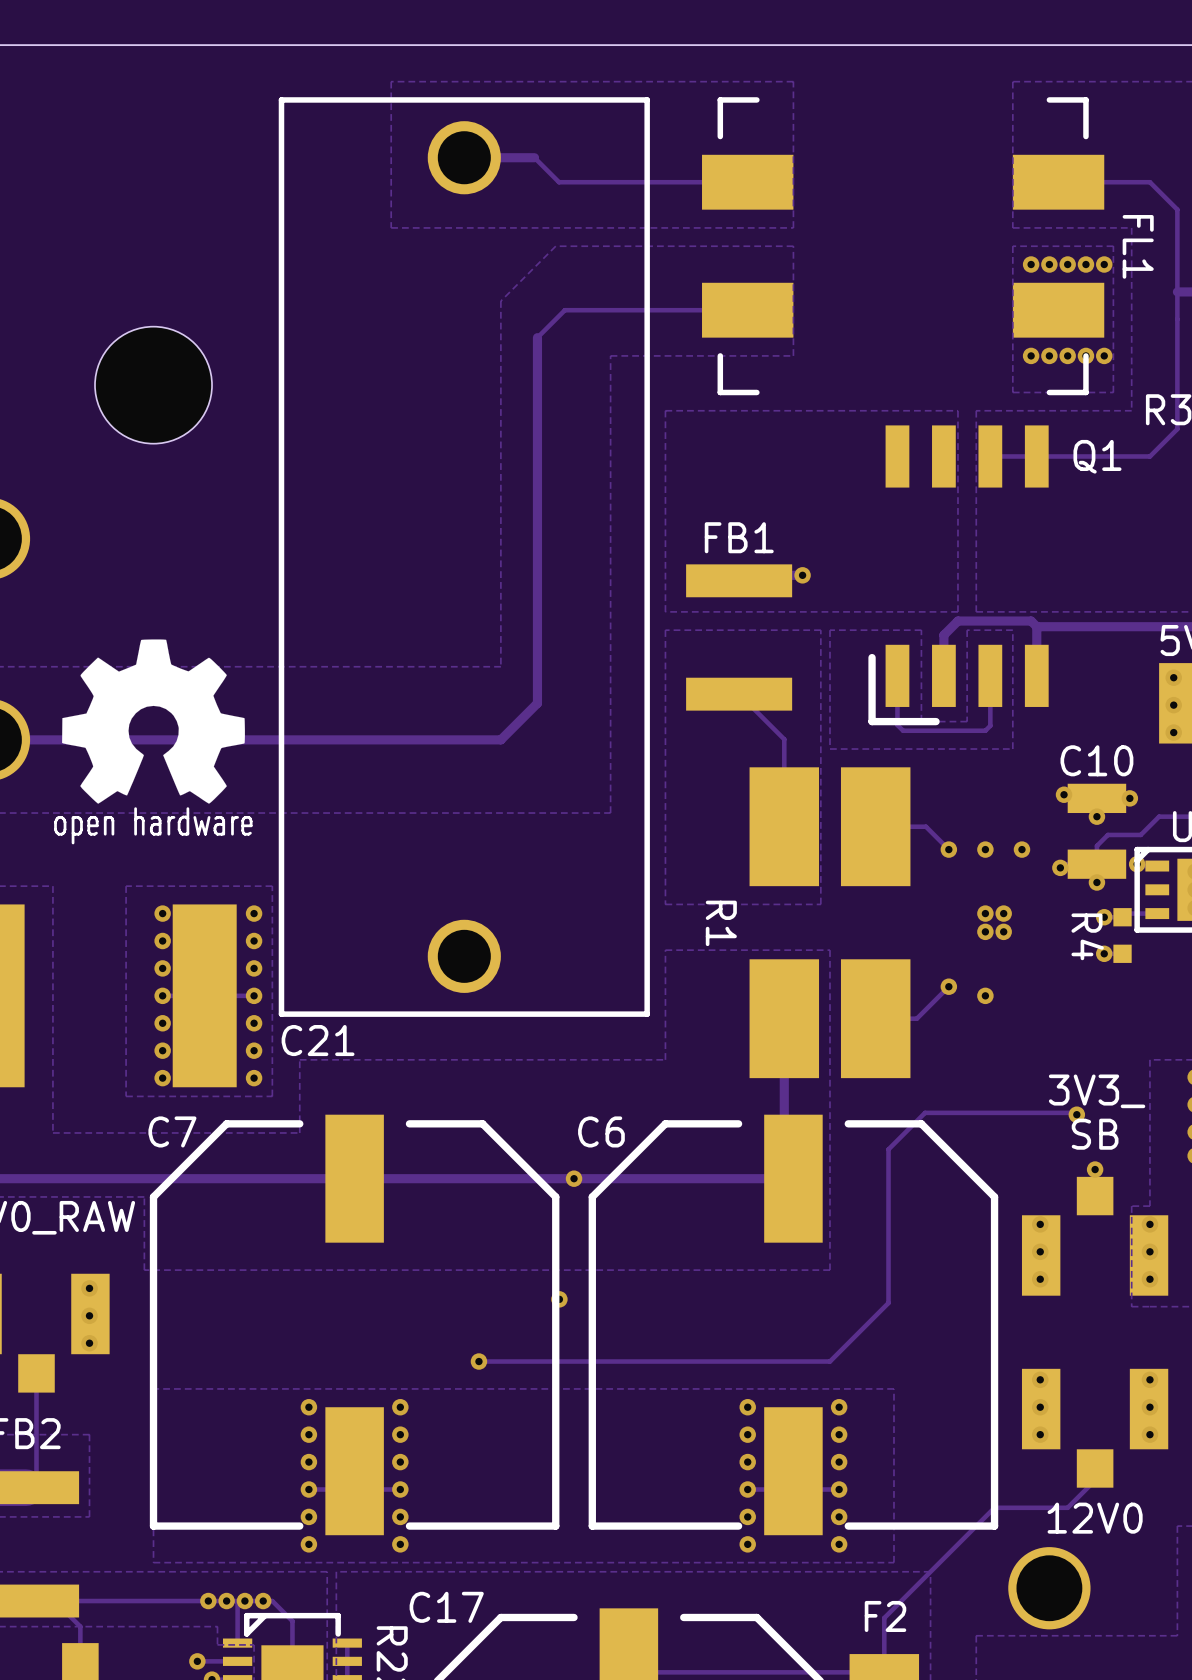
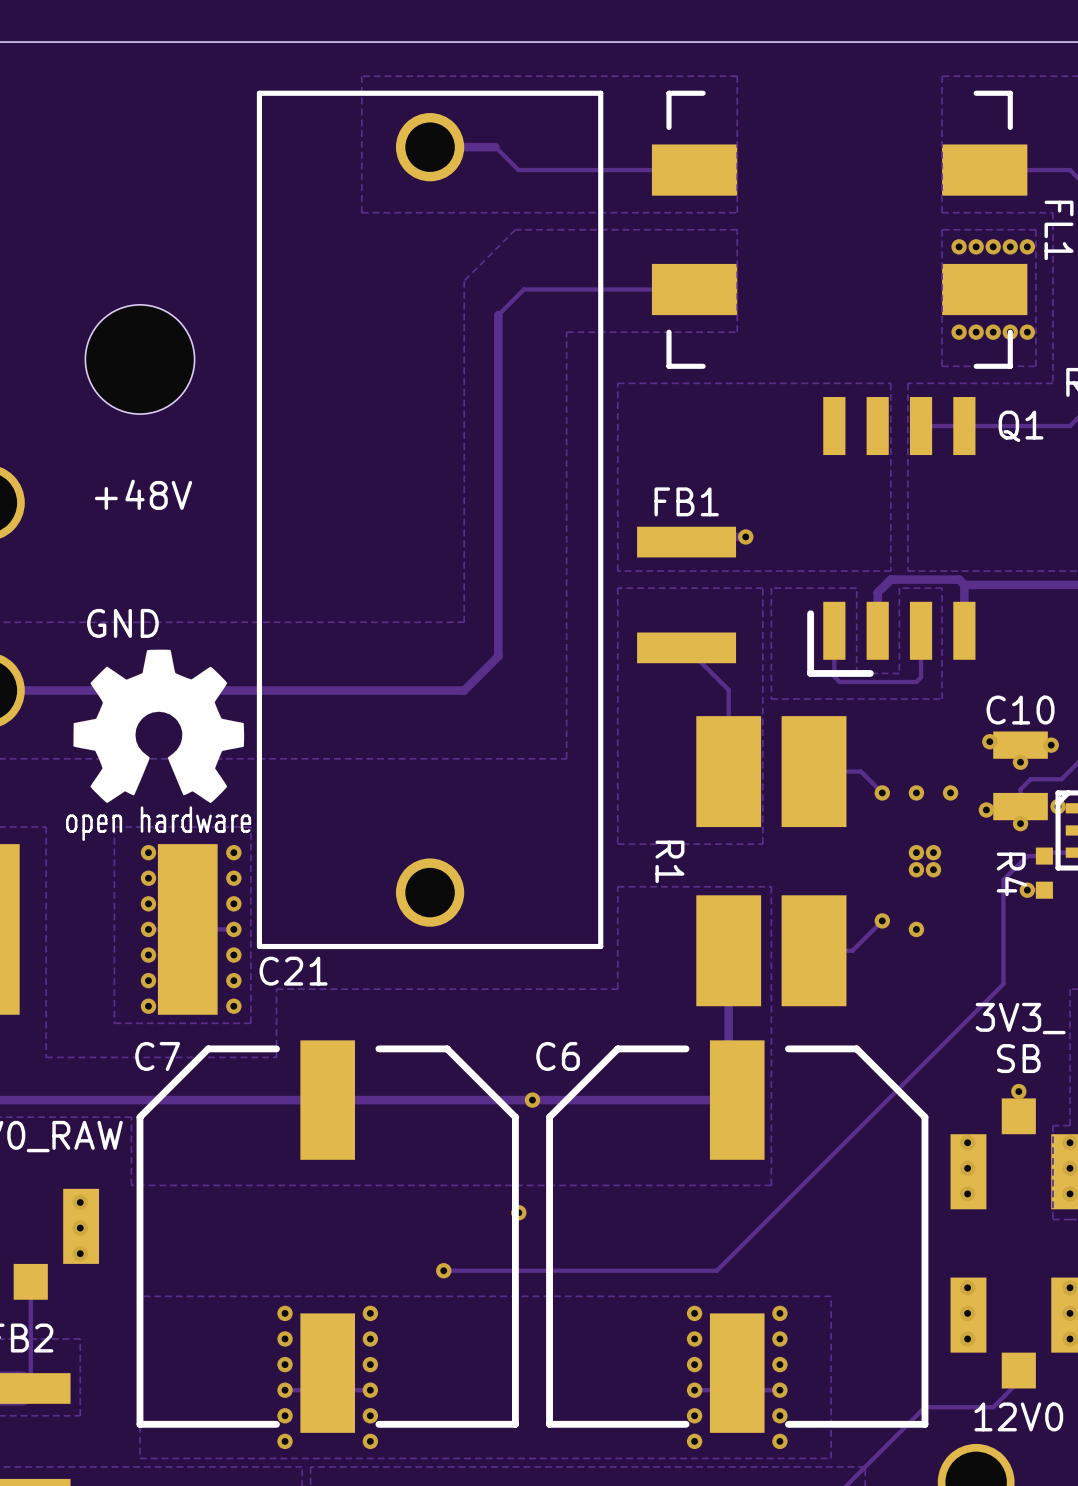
text: none -> +48V (143, 494)
text: none -> GND (122, 623)
drawing position: (153, 741) -> (158, 745)
via: (1104, 917) -> none
track: (1075, 1112) (925, 1112) (888, 1149) (888, 1303) (830, 1361) (771, 1361) -> (1027, 856) (1003, 879) (1003, 984) (716, 1270)
via: (1076, 1114) -> none

